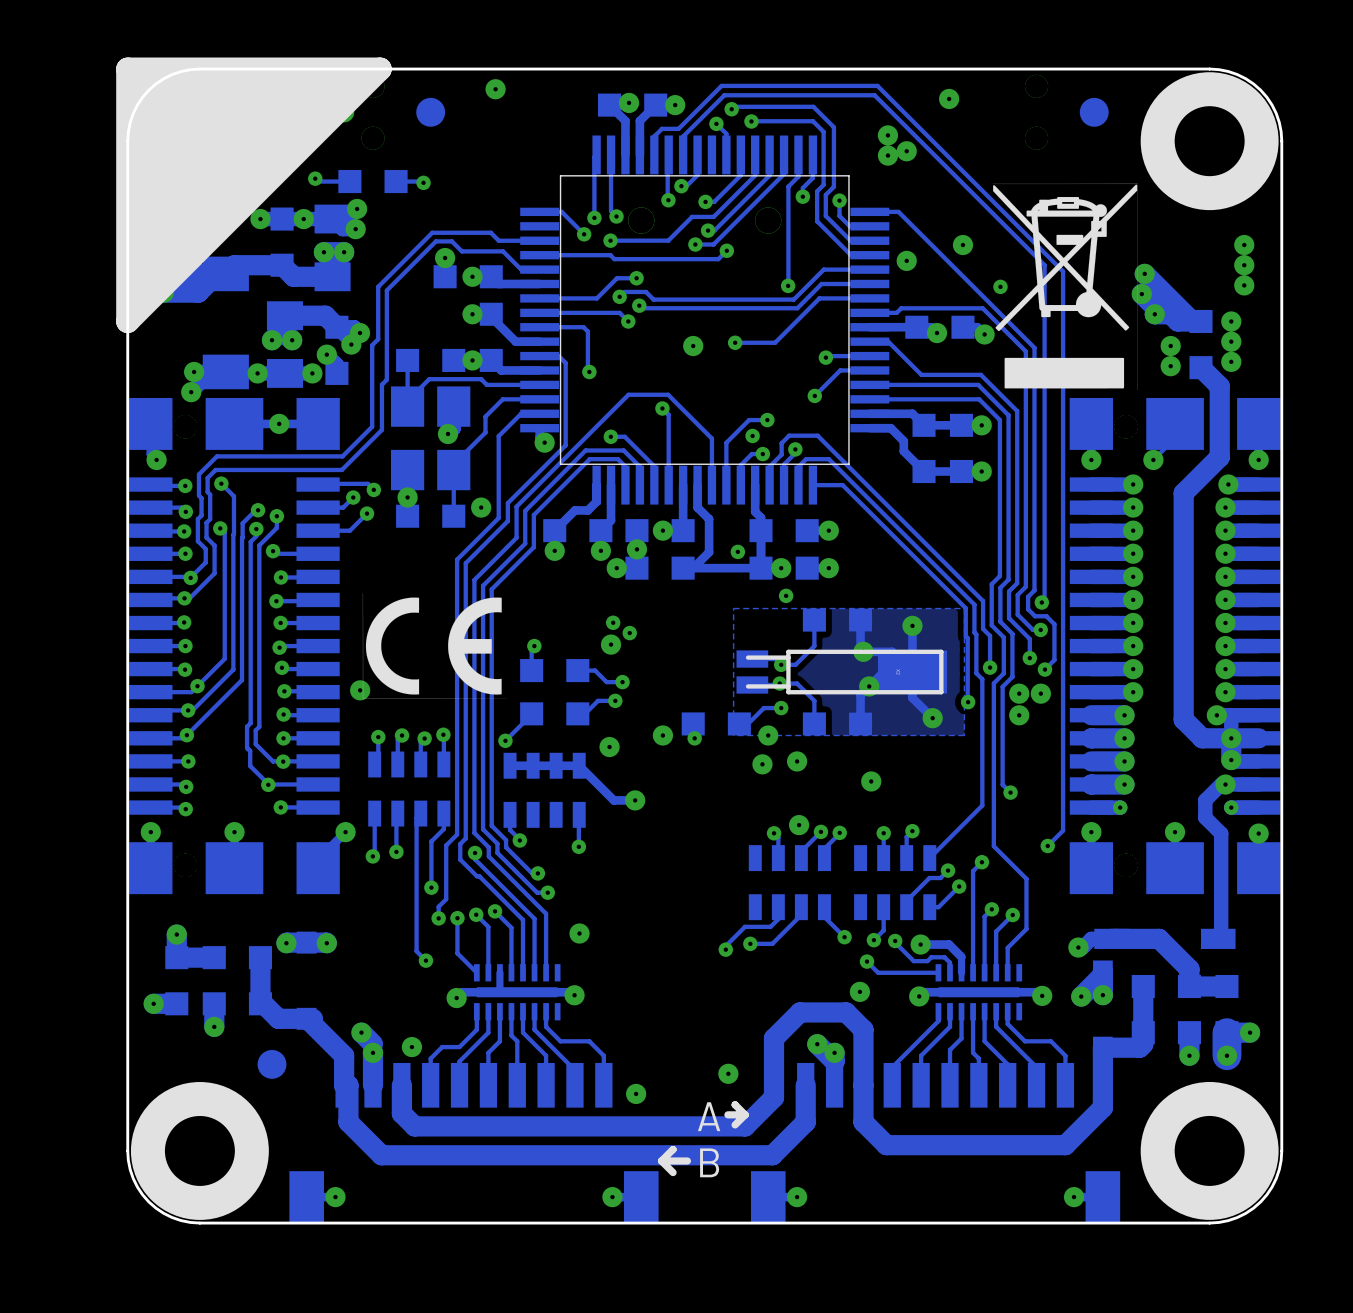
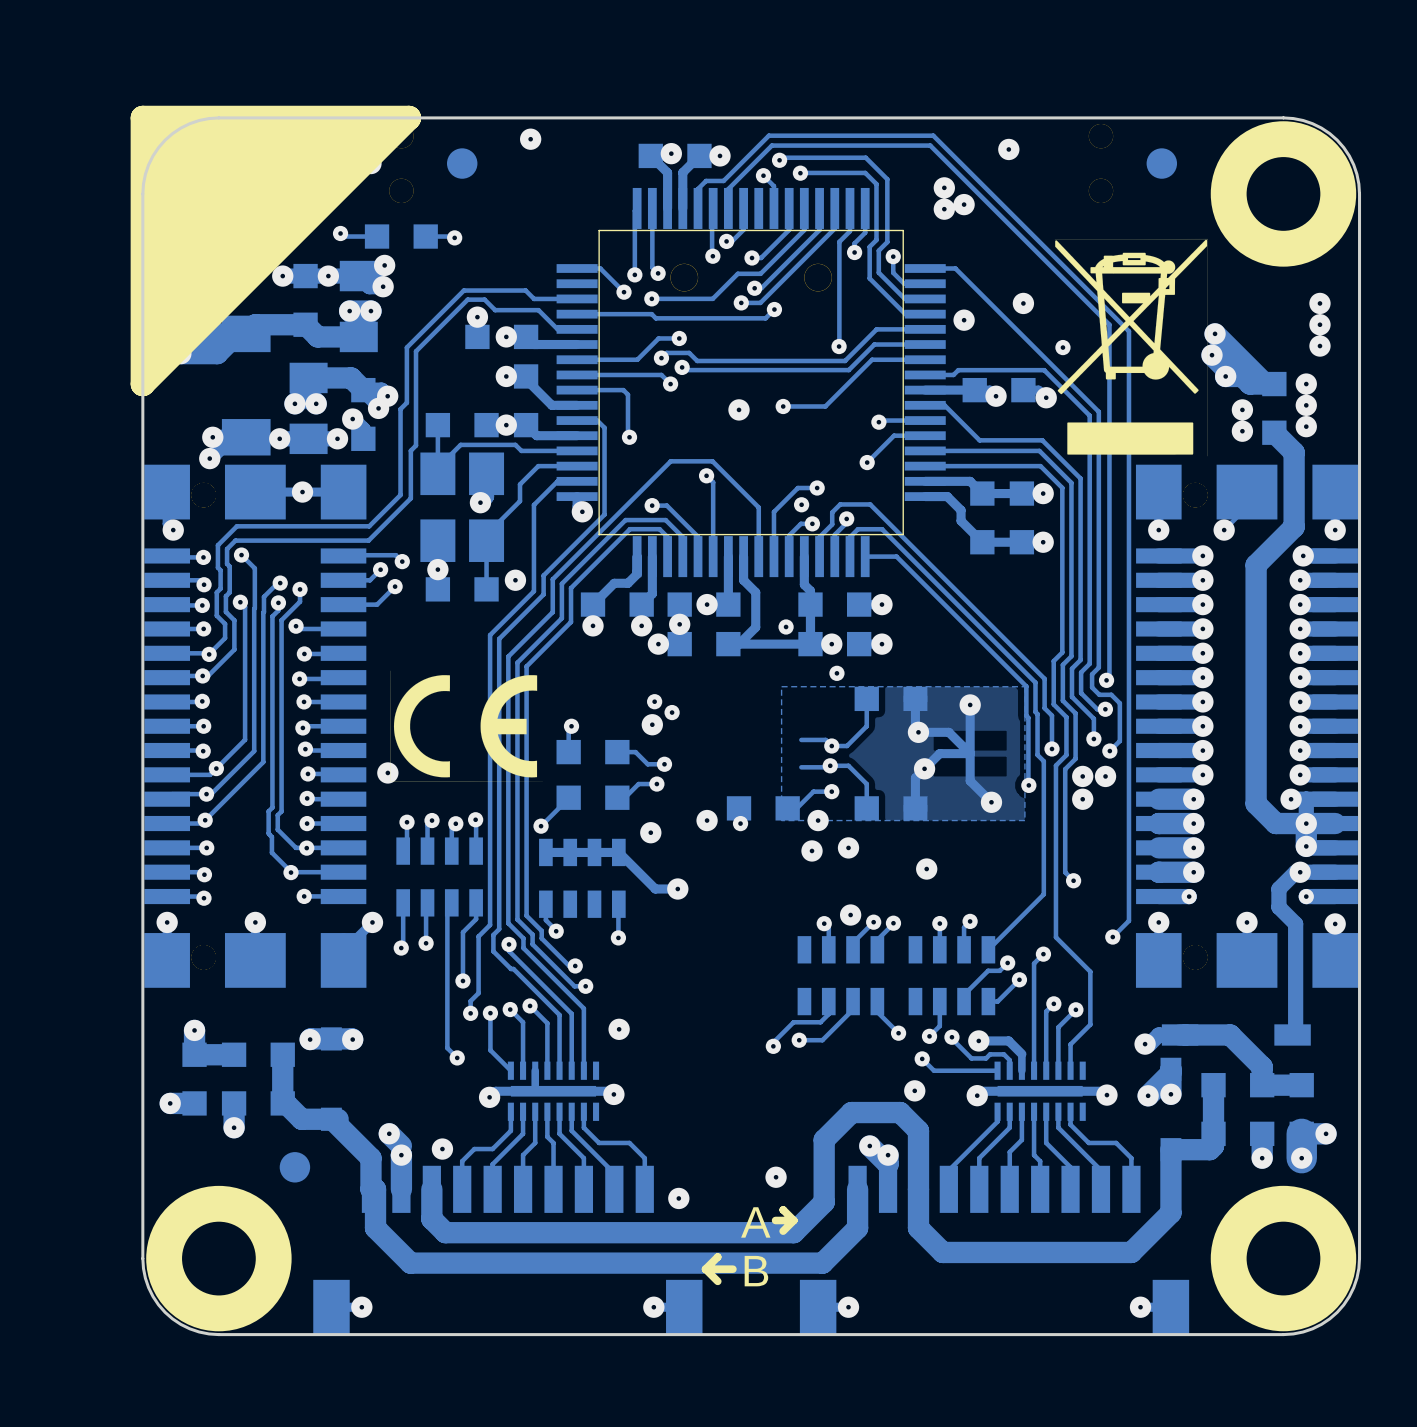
part: (841, 672) -> none

